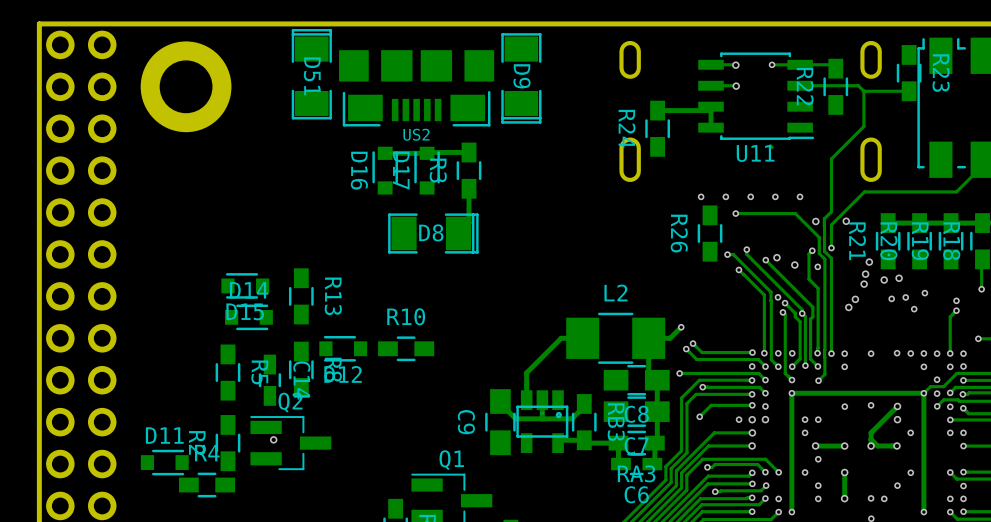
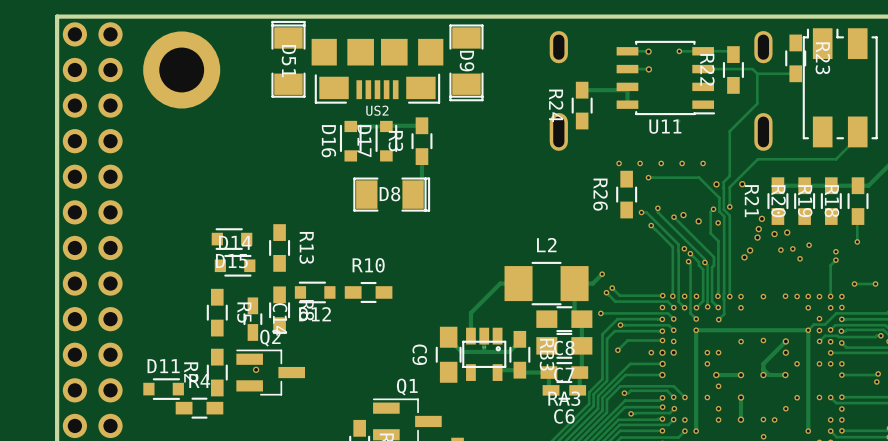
via: none -> (819, 363)
via: none -> (819, 397)

